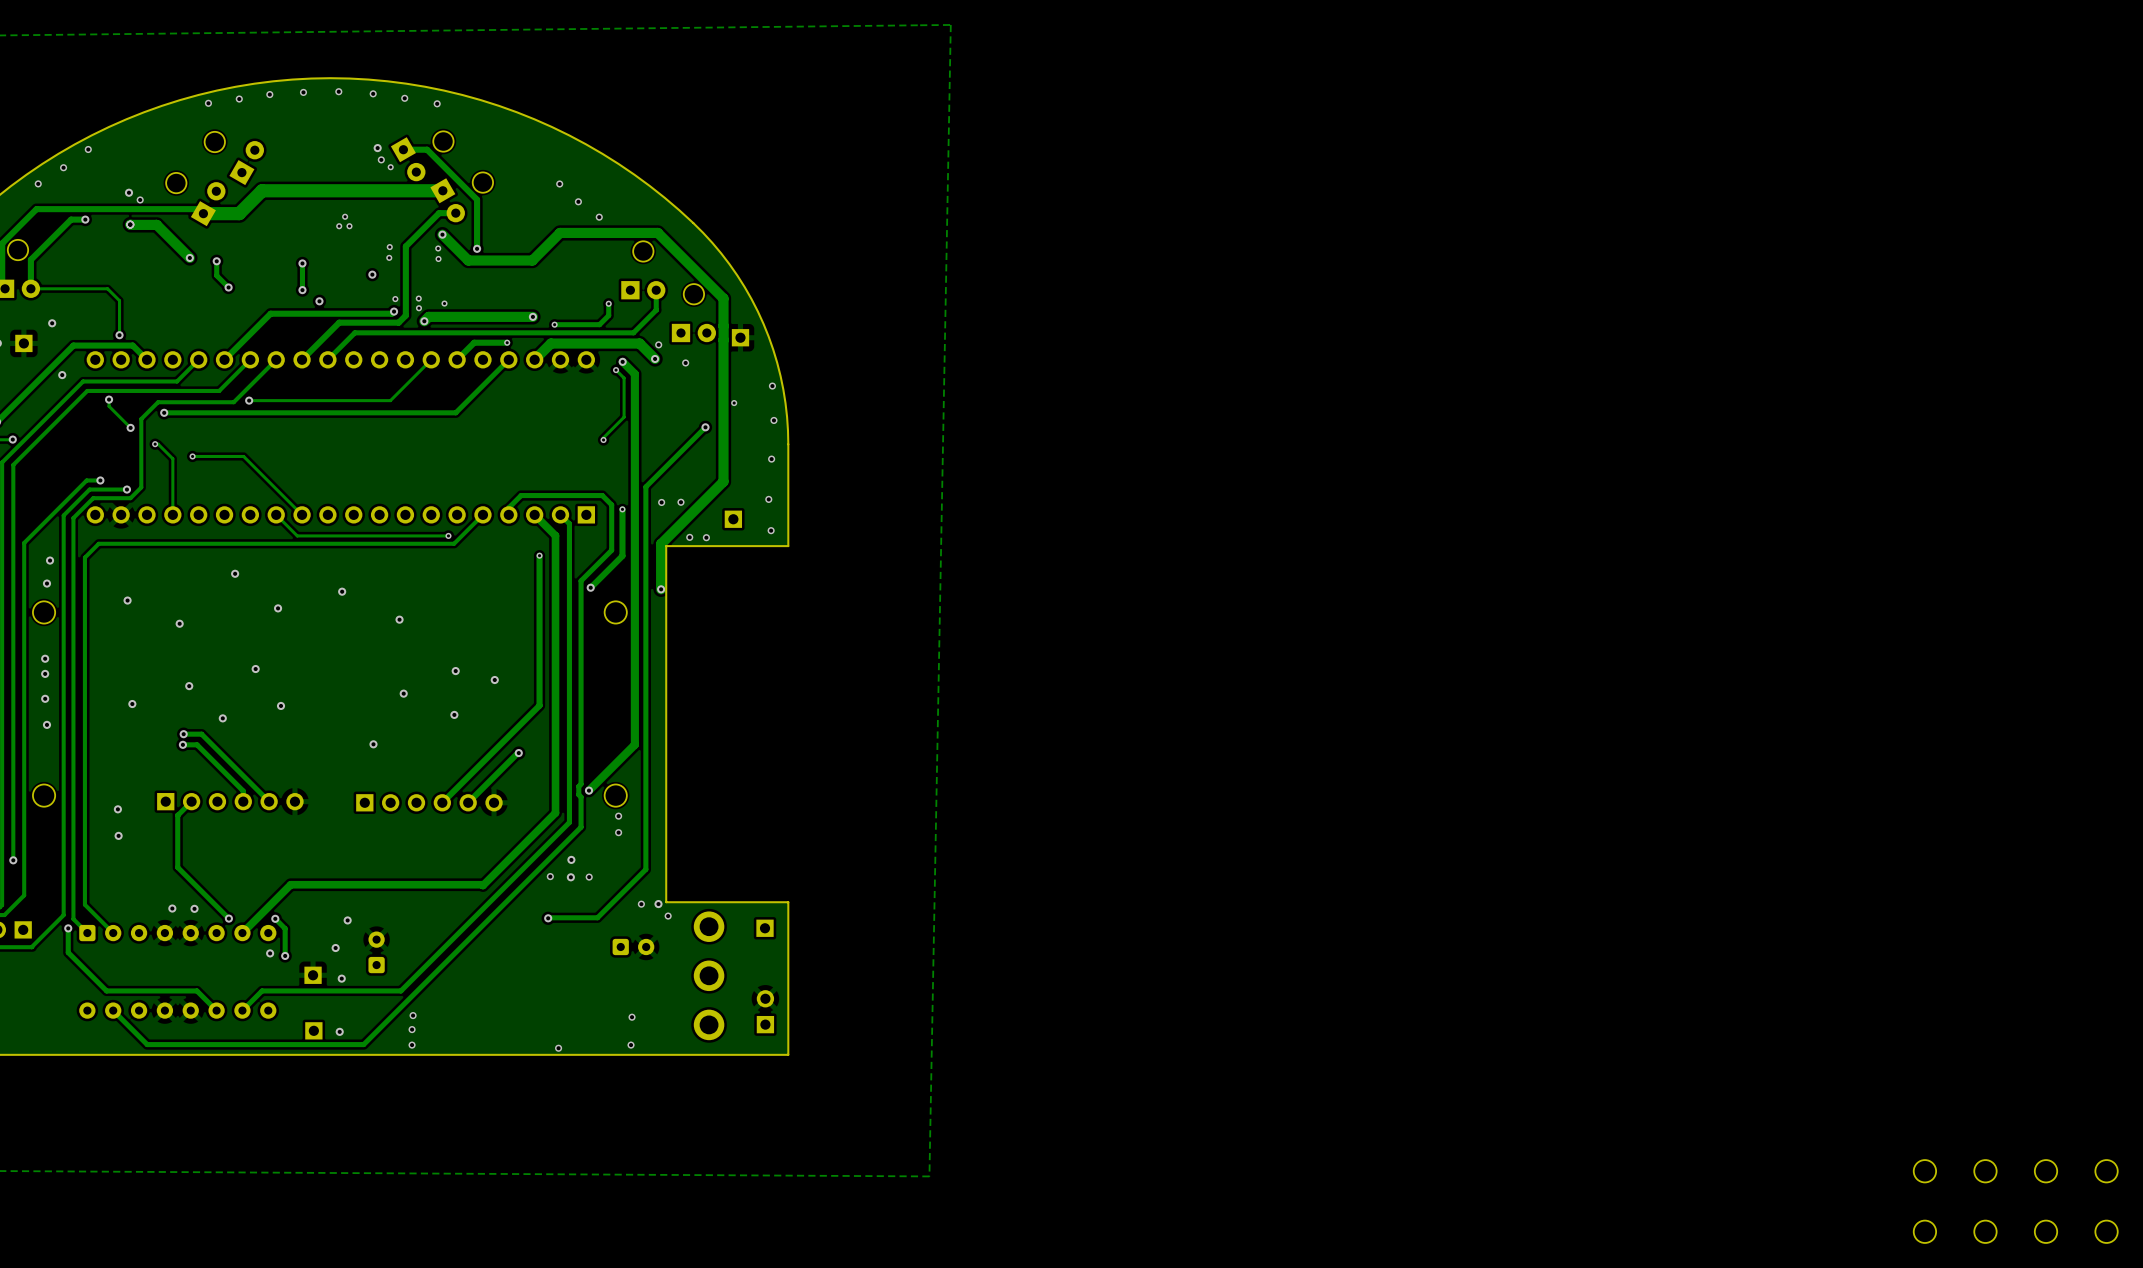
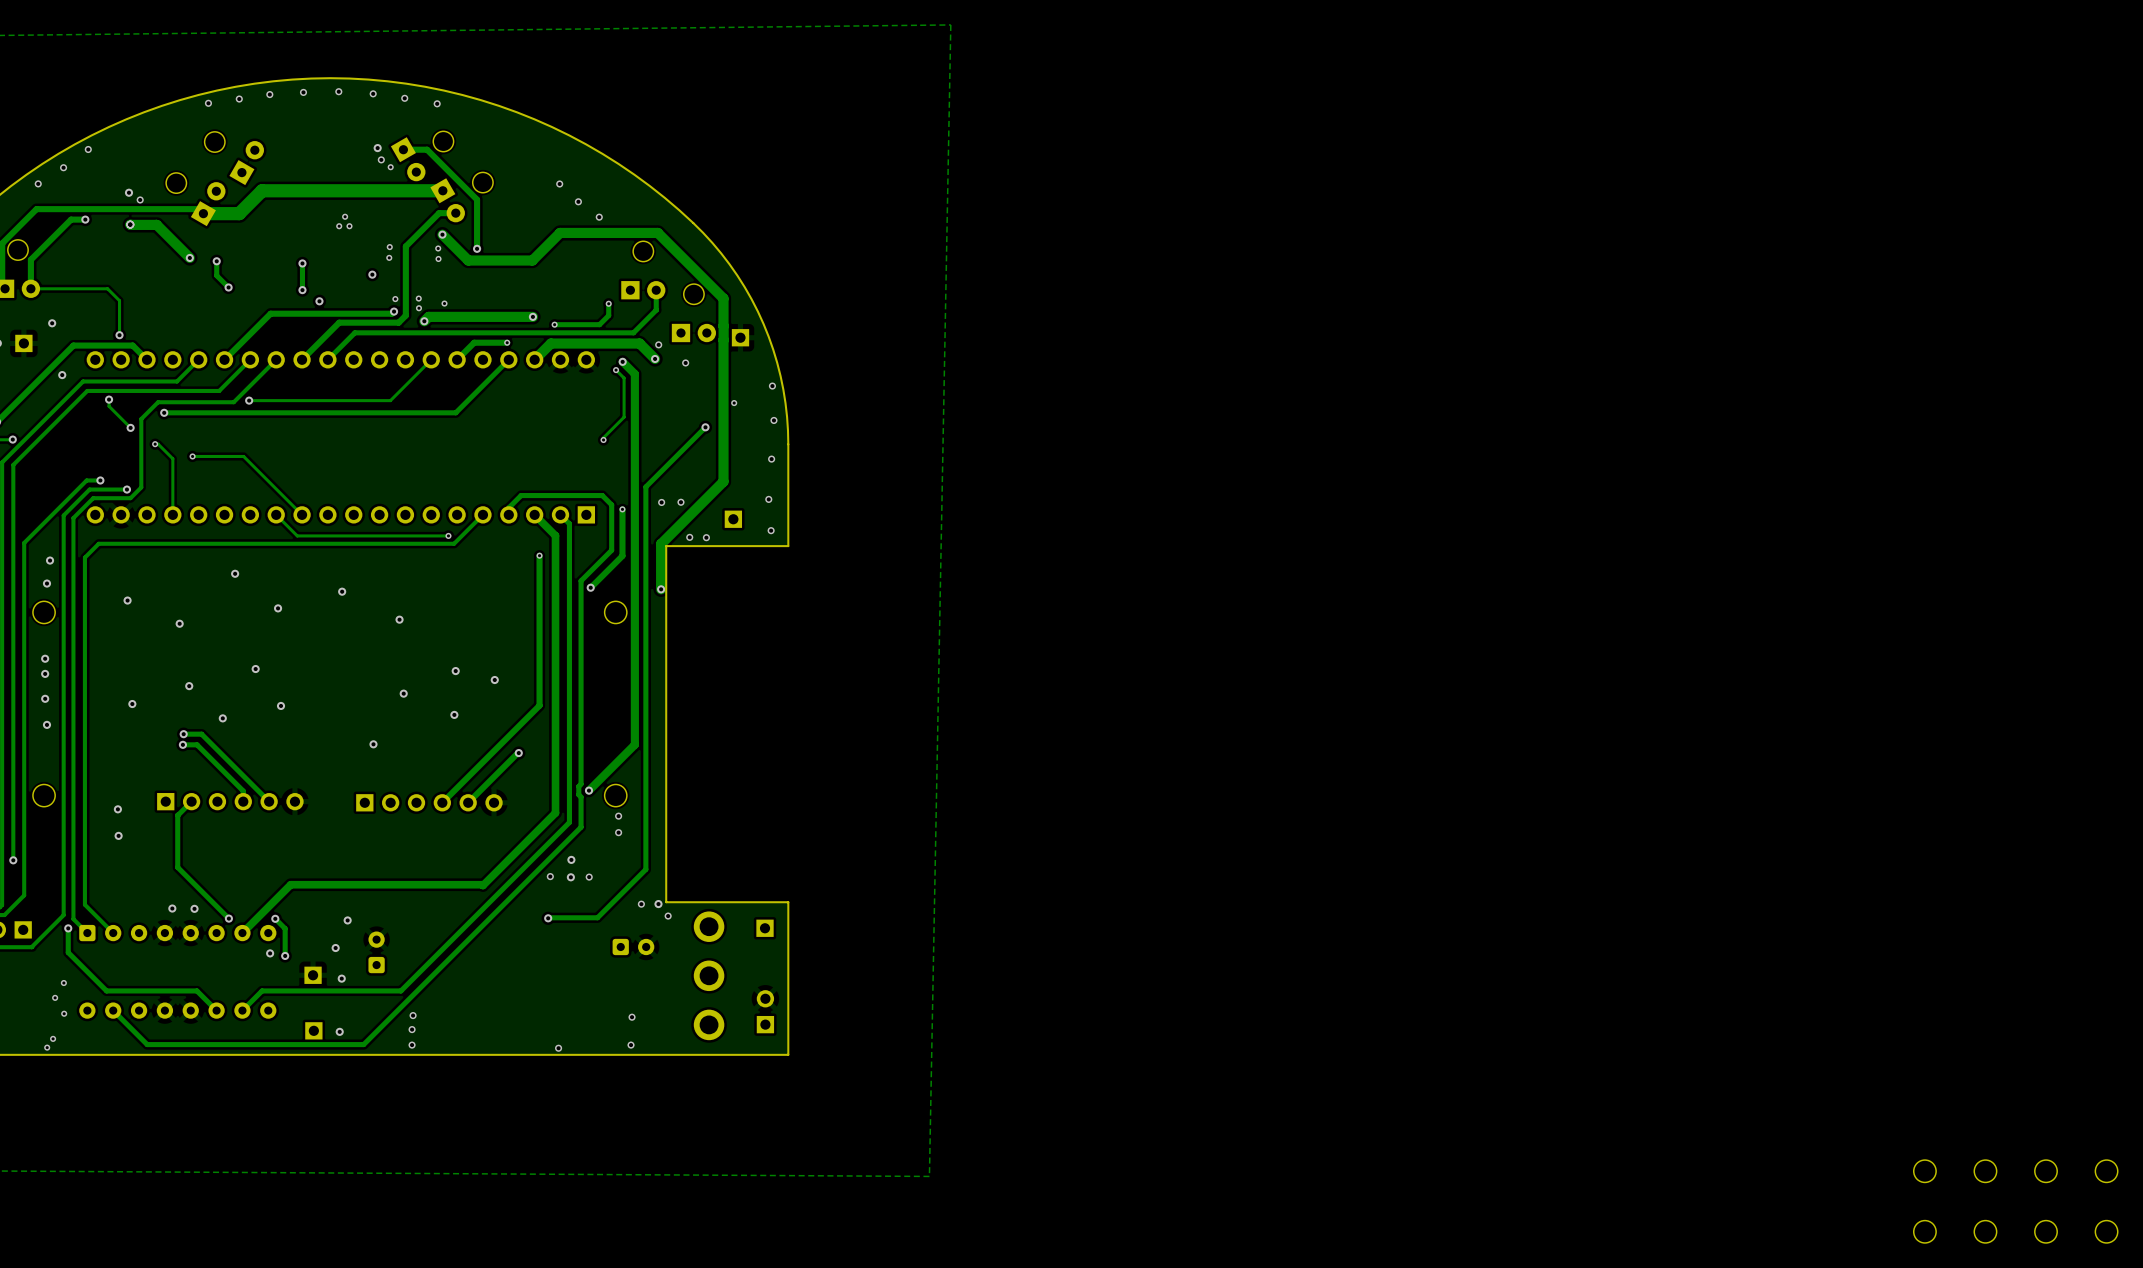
via: none -> (63, 983)
via: none -> (55, 997)
via: none -> (64, 1013)
via: none -> (53, 1038)
via: none -> (47, 1047)

